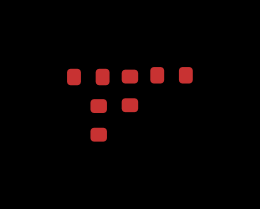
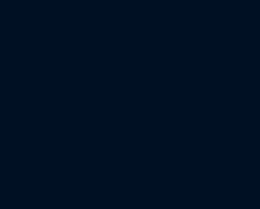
part: (171, 75) -> none
part: (88, 77) -> none
part: (129, 90) -> none
part: (98, 120) -> none

